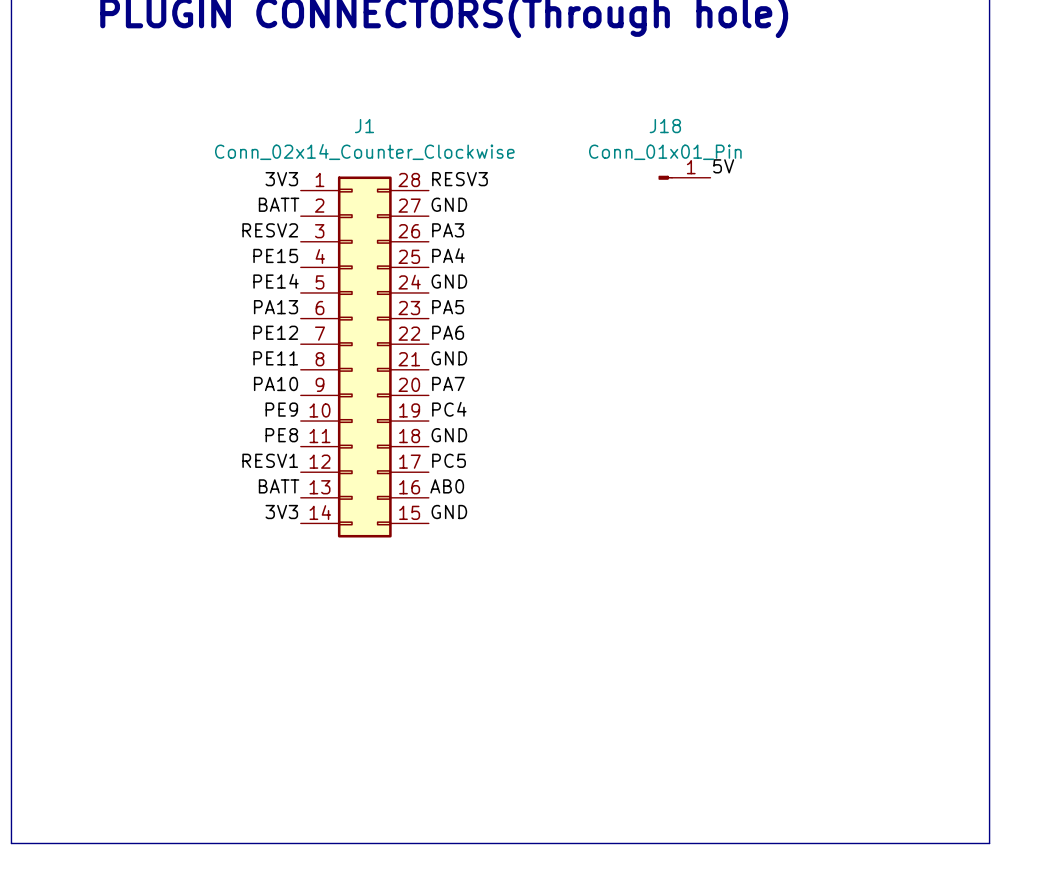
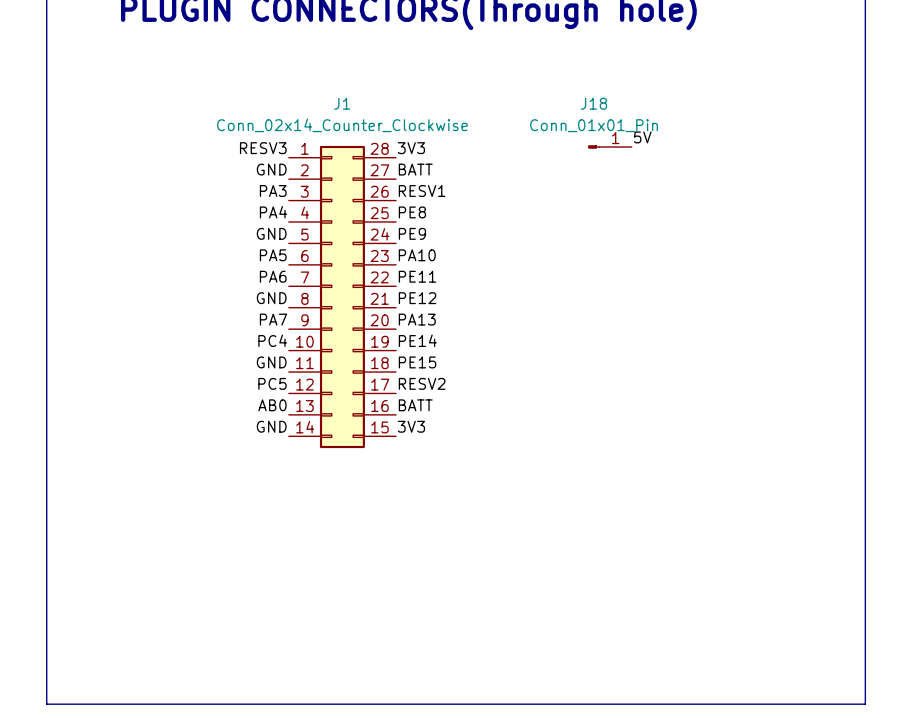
label: 3V3 (281, 179) -> RESV3 (263, 148)
label: RESV3 (460, 179) -> 3V3 (411, 148)
label: BATT (279, 204) -> GND (271, 169)
label: GND (449, 204) -> BATT (415, 169)
label: RESV2 (270, 230) -> PA3 (273, 191)
label: PA3 (448, 230) -> RESV1 (422, 191)
label: PE15 (275, 255) -> PA4 (273, 212)
label: PA4 (448, 255) -> PE8 (412, 212)
label: PE14 (276, 281) -> GND (271, 233)
label: GND (449, 281) -> PE9 (412, 233)
label: PA13 (276, 307) -> PA5 (273, 255)
label: PA5 (448, 307) -> PA10 (417, 255)
label: PE12 (275, 332) -> PA6 (273, 276)
label: PA6 (448, 332) -> PE11 (417, 276)
label: PE11 (275, 358) -> GND (271, 298)
label: GND (449, 358) -> PE12 (417, 298)
label: PA10 (276, 383) -> PA7 (273, 319)
label: PA7 (448, 383) -> PA13 (417, 319)
label: PE9 (281, 409) -> PC4 (272, 340)
label: PC4 (449, 409) -> PE14 (417, 340)
label: PE8 (281, 435) -> GND (271, 362)
label: GND (449, 435) -> PE15 (417, 362)
label: RESV1 (270, 460) -> PC5 (272, 383)
label: PC5 (449, 460) -> RESV2 (422, 383)
label: BATT (279, 486) -> AB0 (272, 405)
label: AB0 (447, 486) -> BATT (415, 405)
label: 3V3 (281, 512) -> GND (271, 426)
label: GND (449, 512) -> 3V3 (411, 426)

